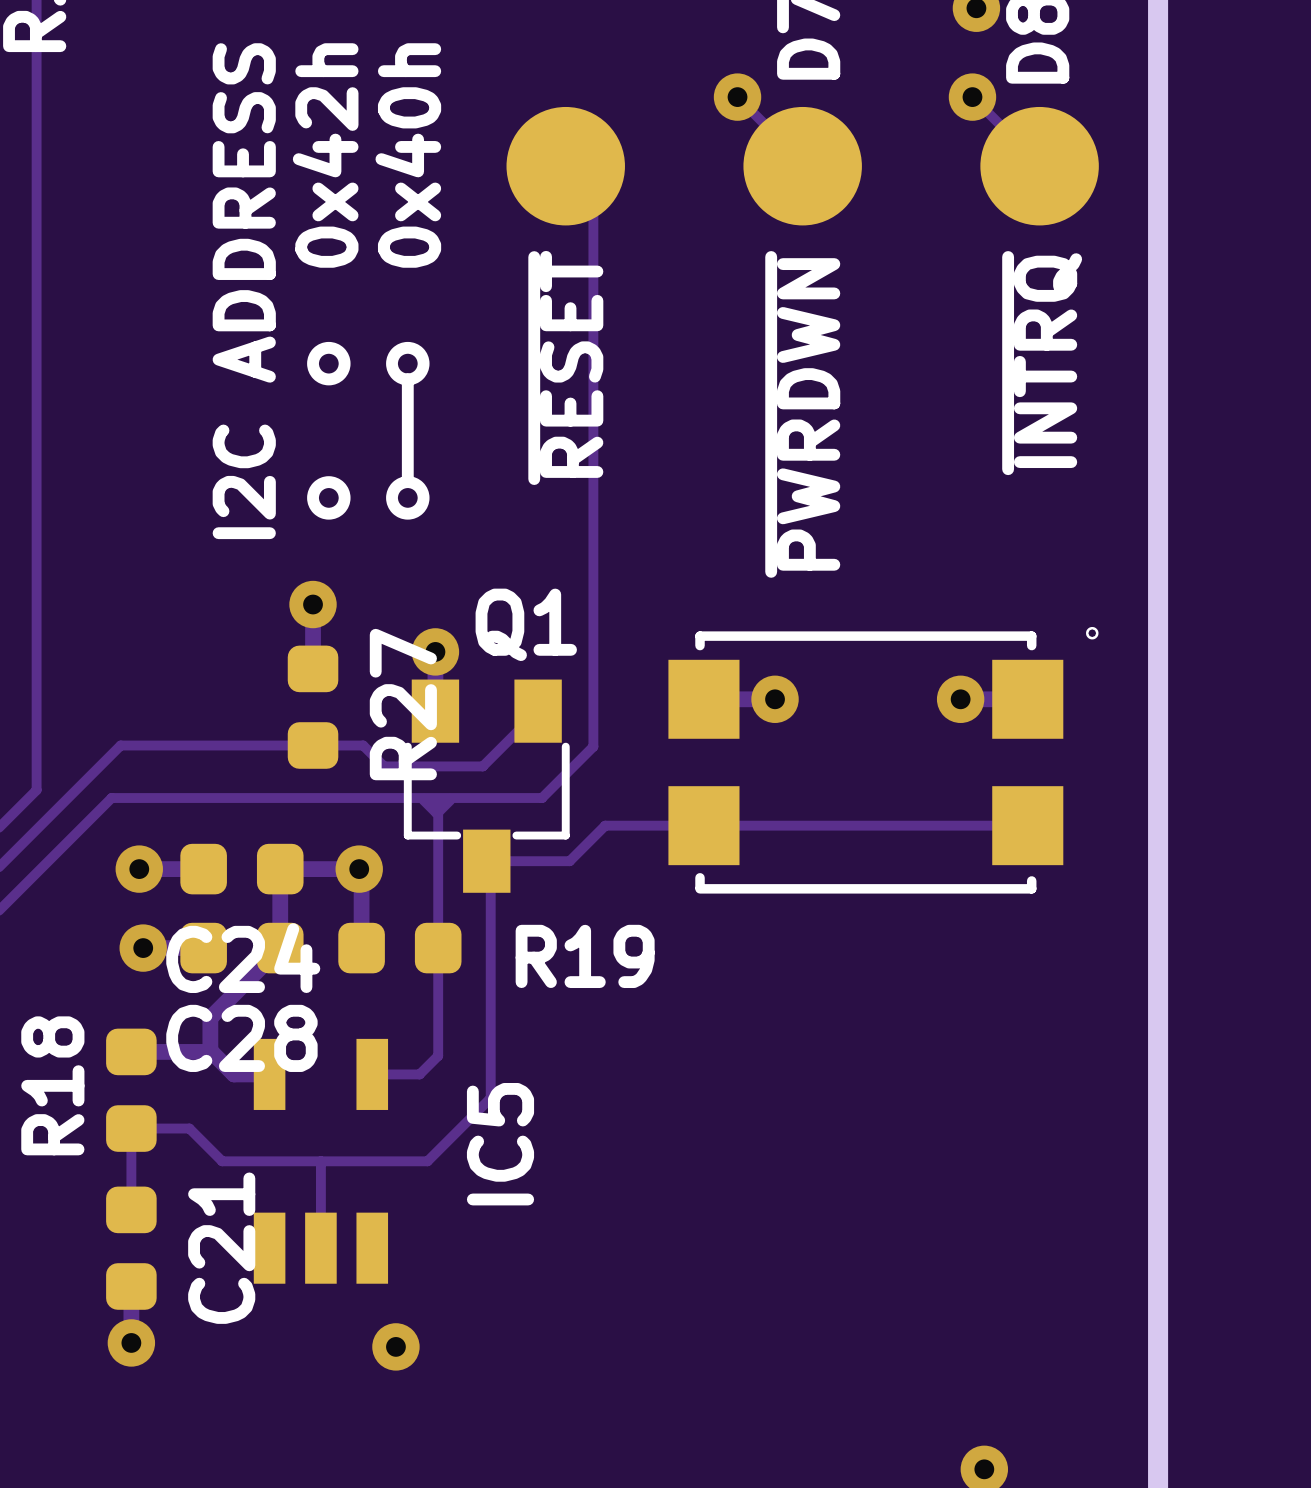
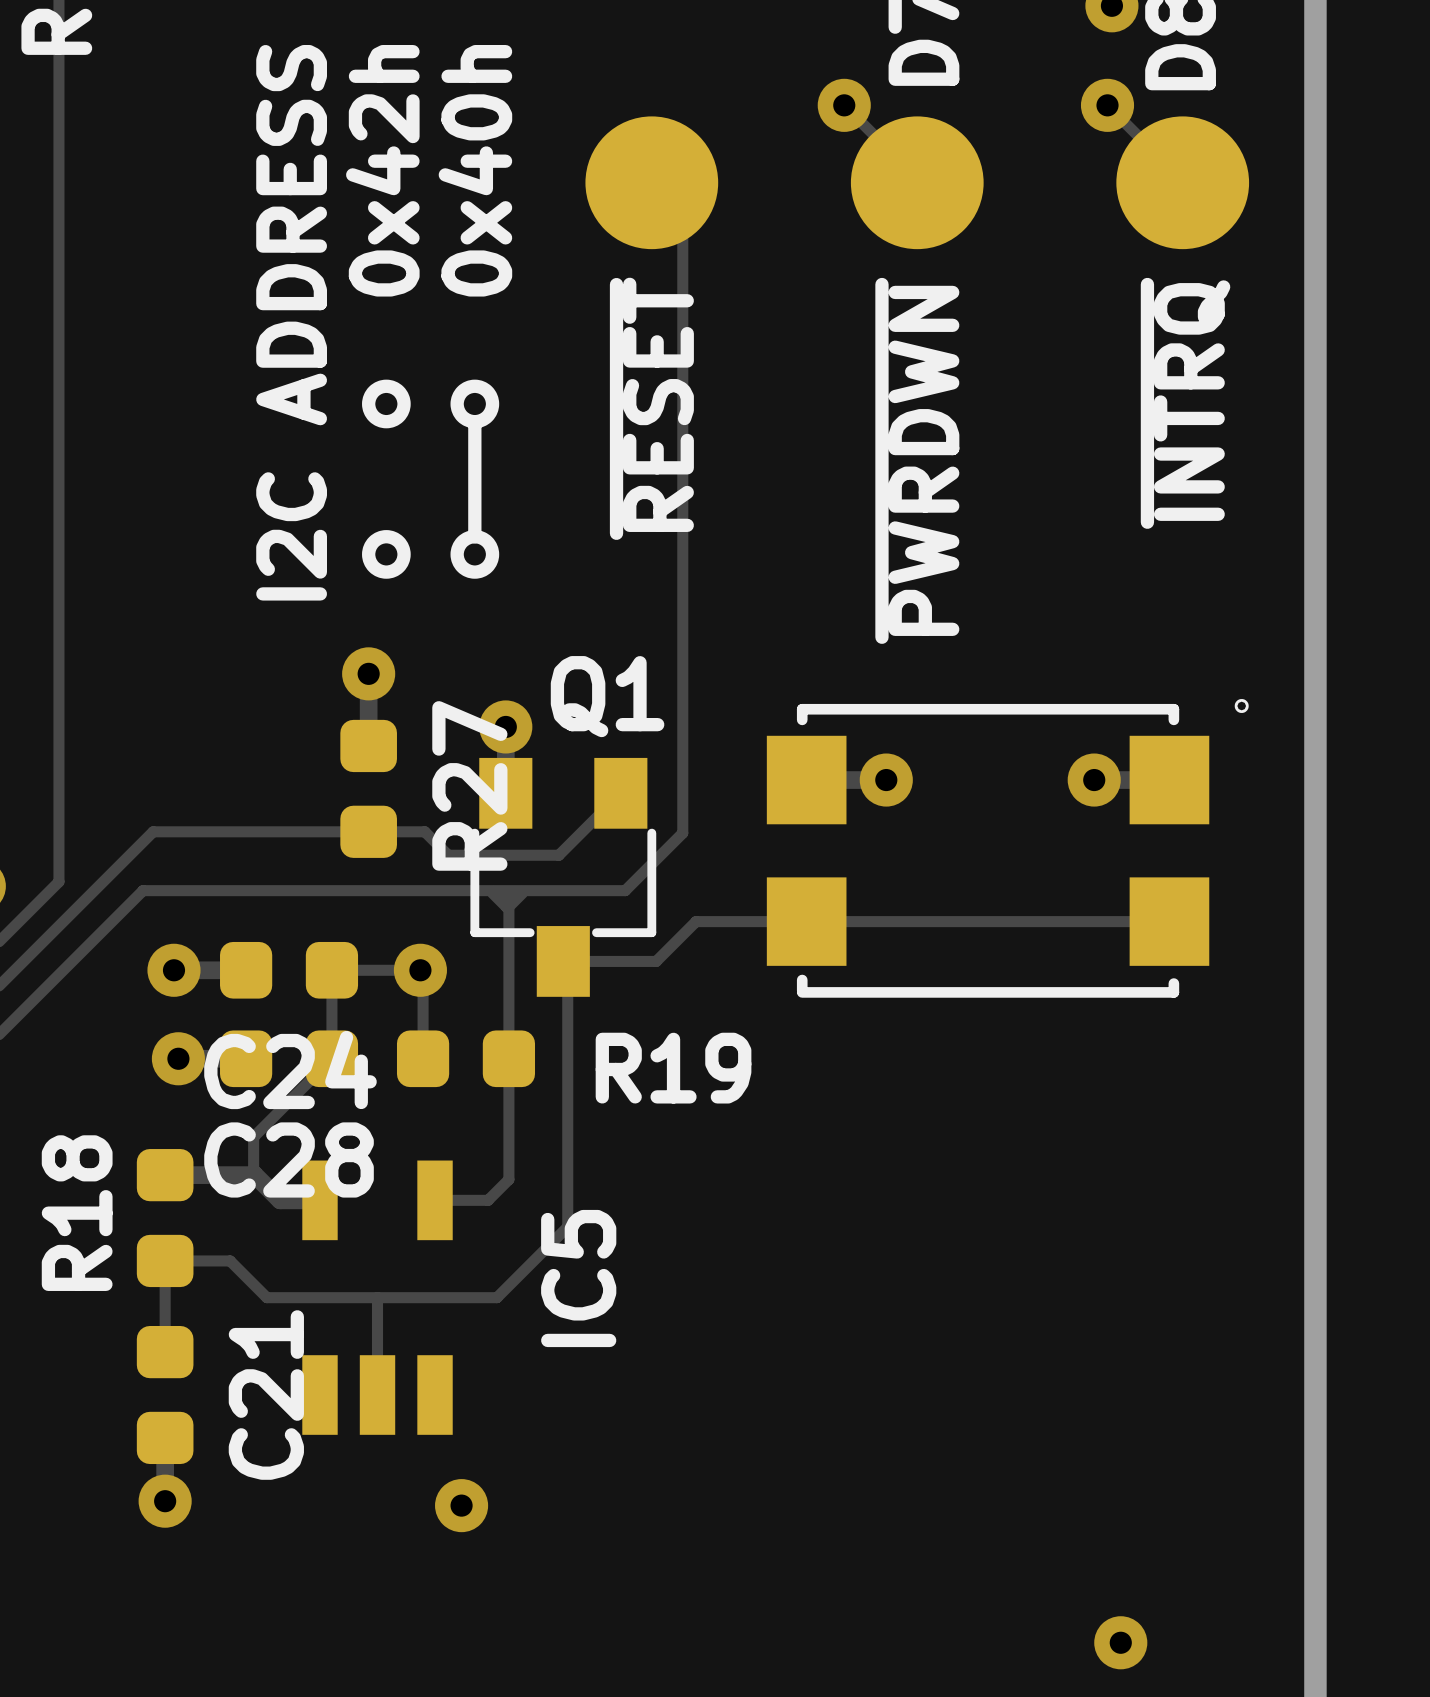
track width: thick (361, 948) (361, 871) (359, 869) (280, 869) (280, 948) (210, 1017) (210, 1050) -> thin (423, 1058) (423, 972) (420, 970) (331, 970) (331, 1058) (253, 1137) (253, 1173)

